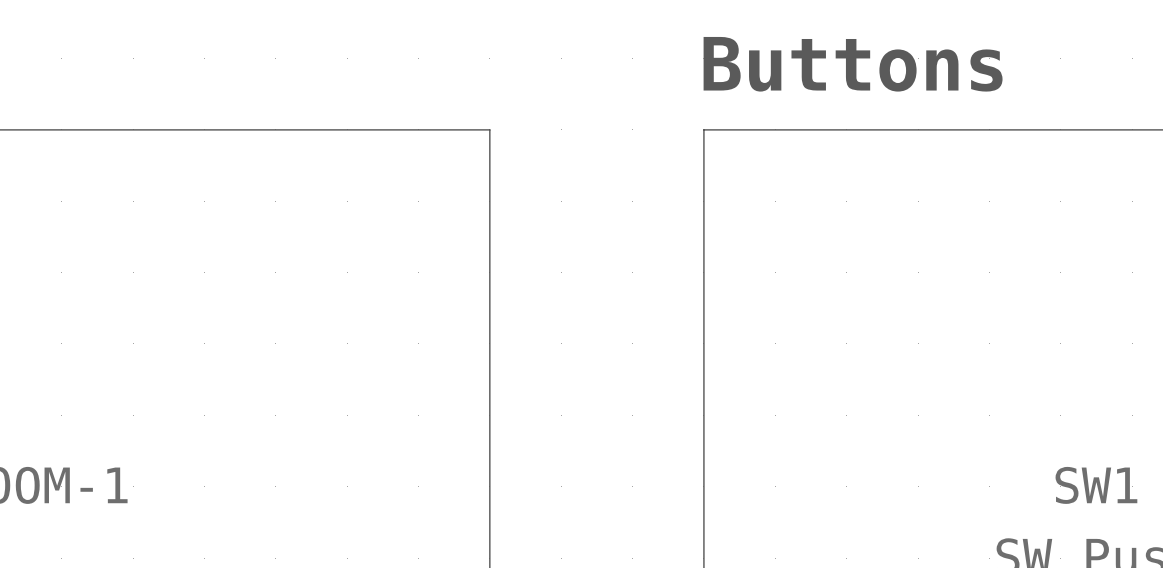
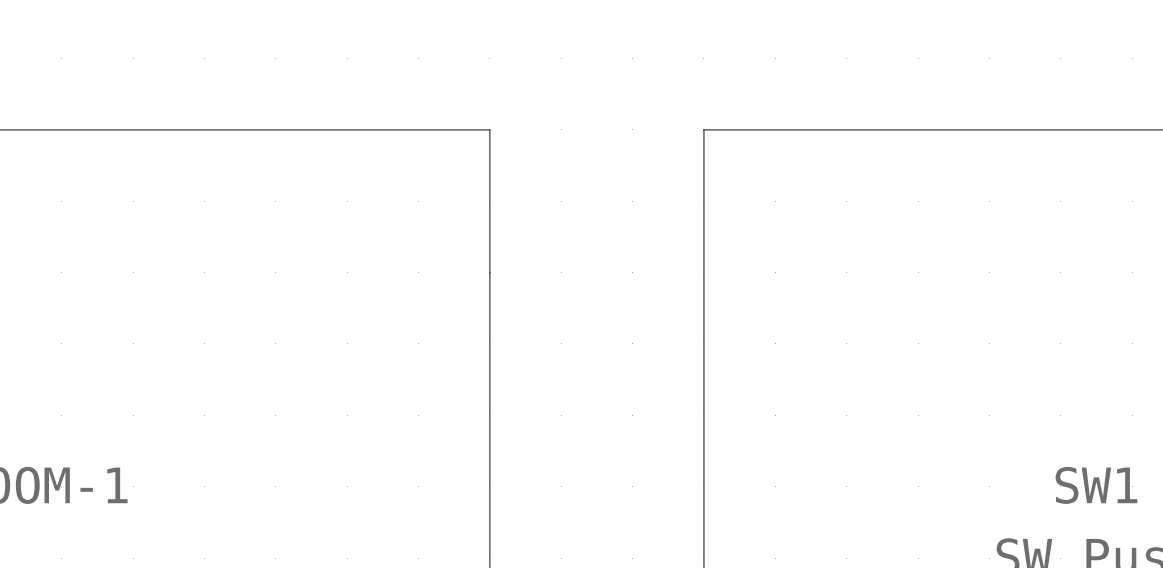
text: Buttons (853, 64) -> none

